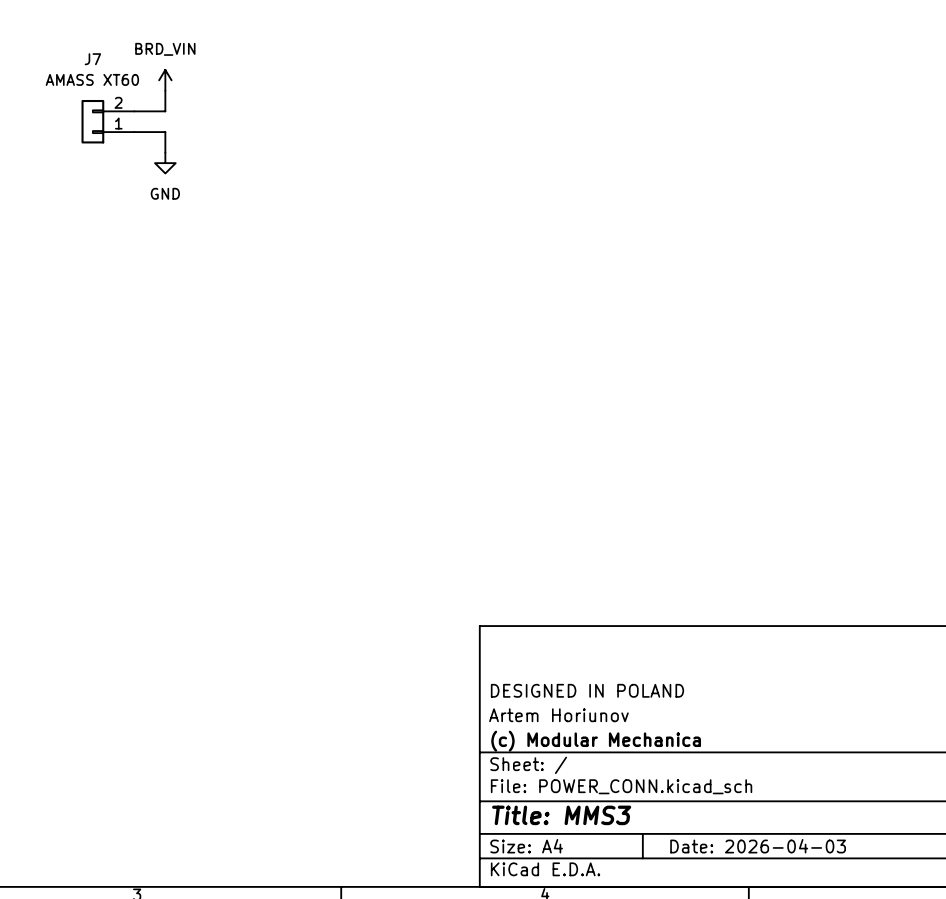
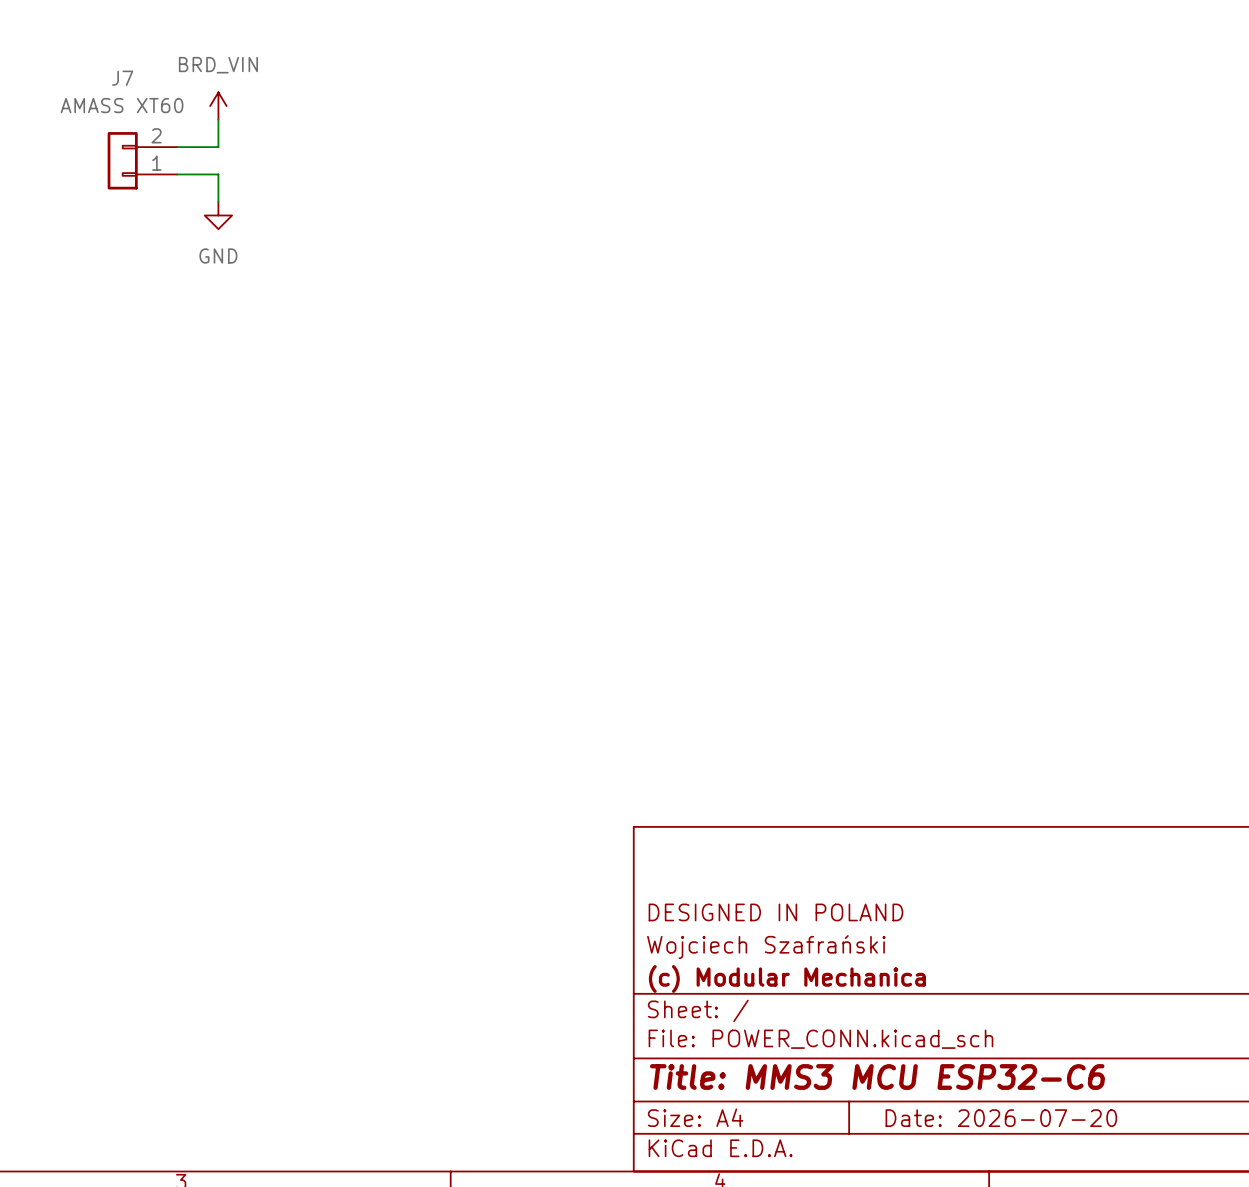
title block: Artem Horiunov (558, 715) -> Wojciech Szafrański (766, 947)
title block: Title: MMS3 (561, 815) -> Title: MMS3 MCU ESP32-C6 (877, 1077)
title block: Date: 2026-04-03 (758, 846) -> Date: 2026-07-20 (1001, 1118)

